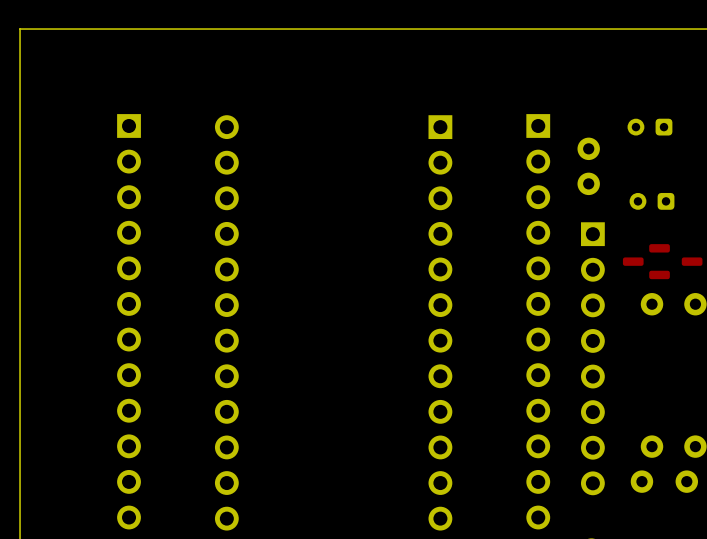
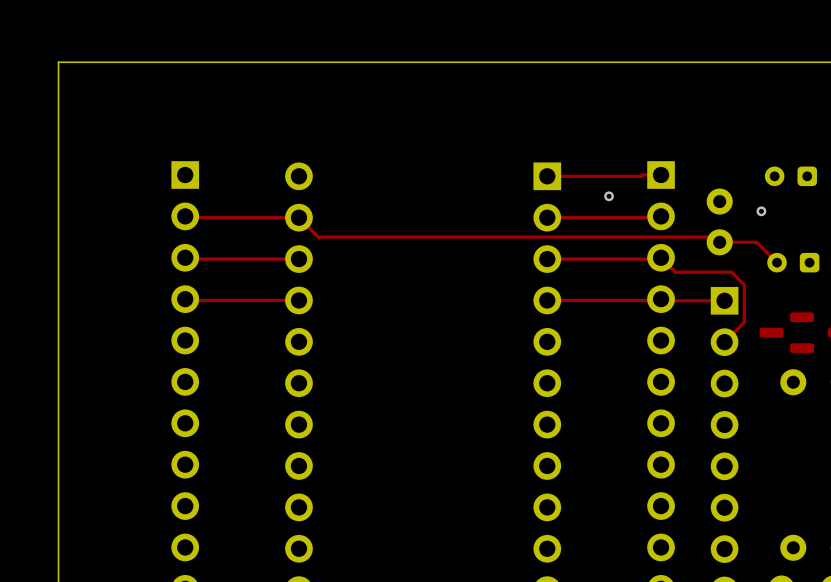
top track: none -> (661, 175) (547, 176)
via: none -> (609, 196)
via: none -> (761, 211)
top track: none -> (185, 216) (298, 217) (318, 237) (714, 237) (719, 242) (756, 242) (777, 262)
top track: none -> (661, 216) (547, 217)
top track: none -> (185, 257) (298, 259)
top track: none -> (547, 259) (661, 257) (675, 272) (731, 272) (744, 284) (744, 322) (724, 342)
top track: none -> (185, 299) (298, 300)
top track: none -> (547, 300) (661, 299) (662, 300) (724, 300)

